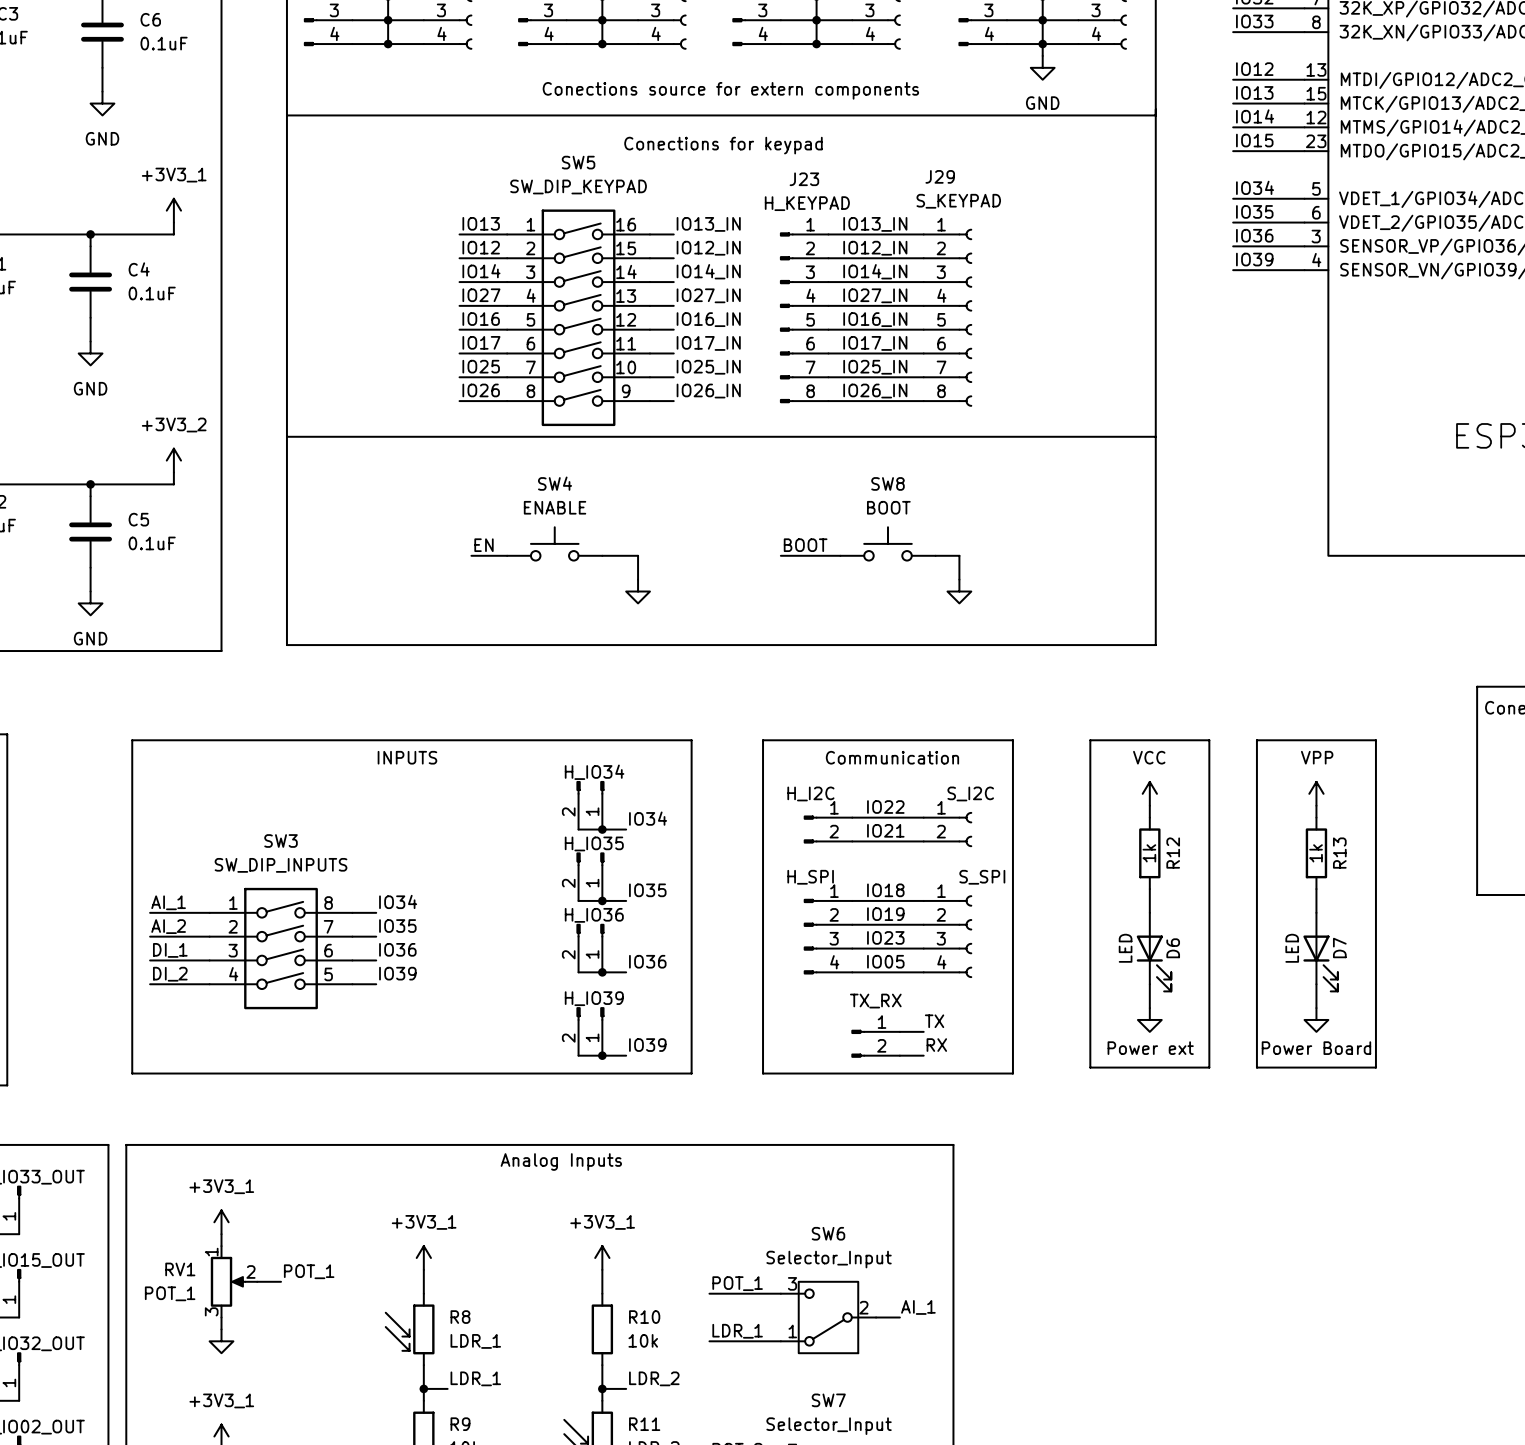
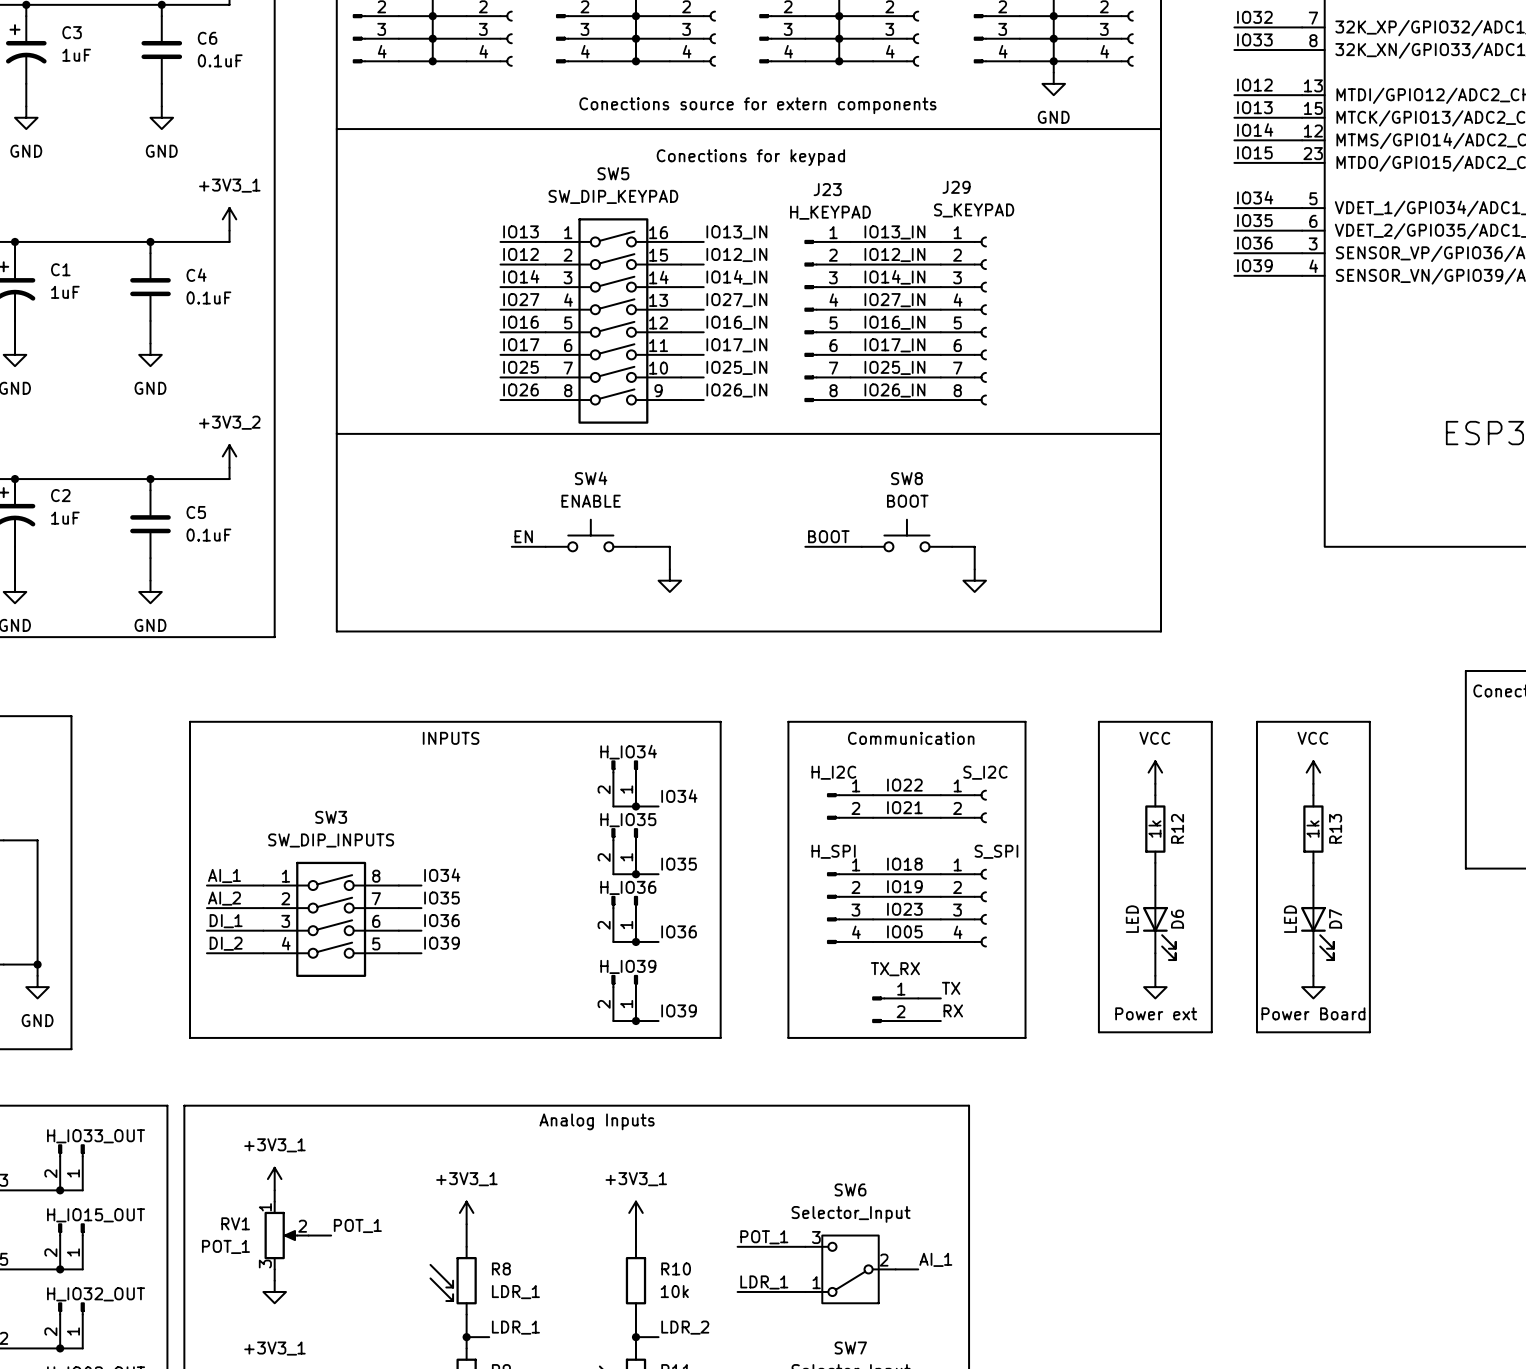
power symbol: VPP (1316, 793) -> VCC (1313, 772)

